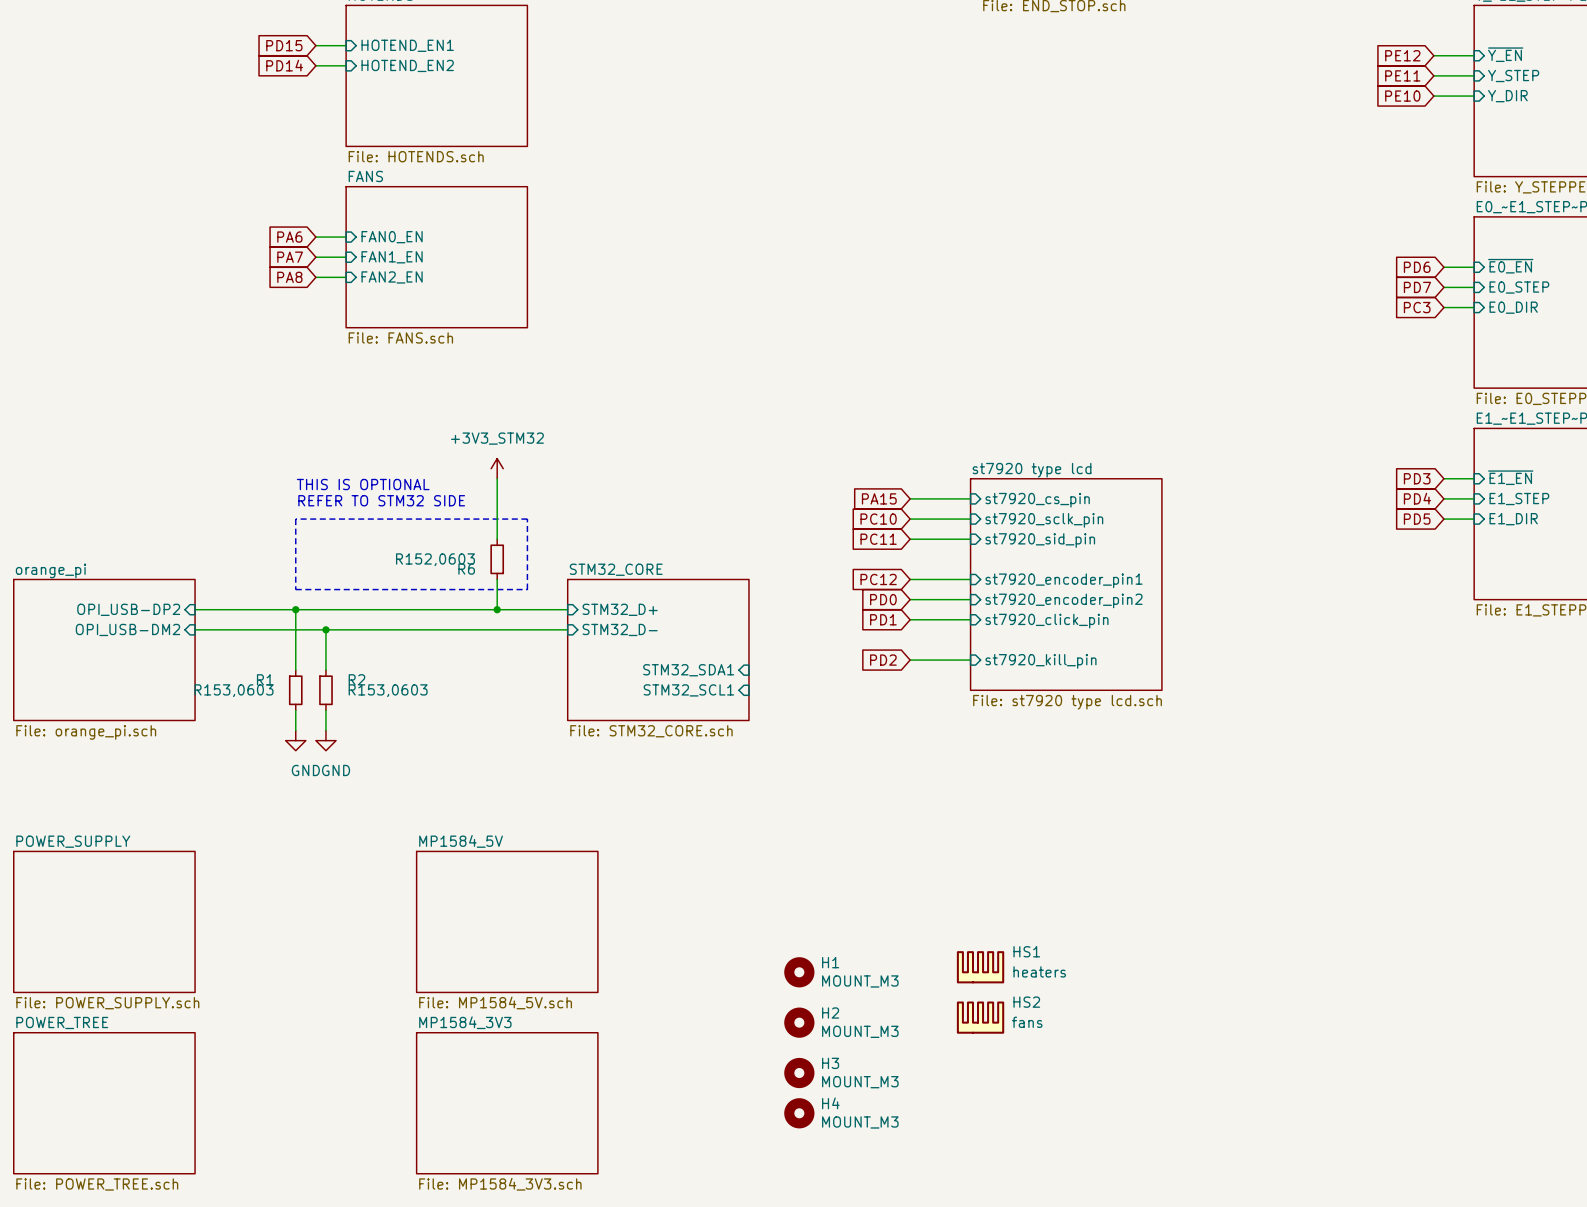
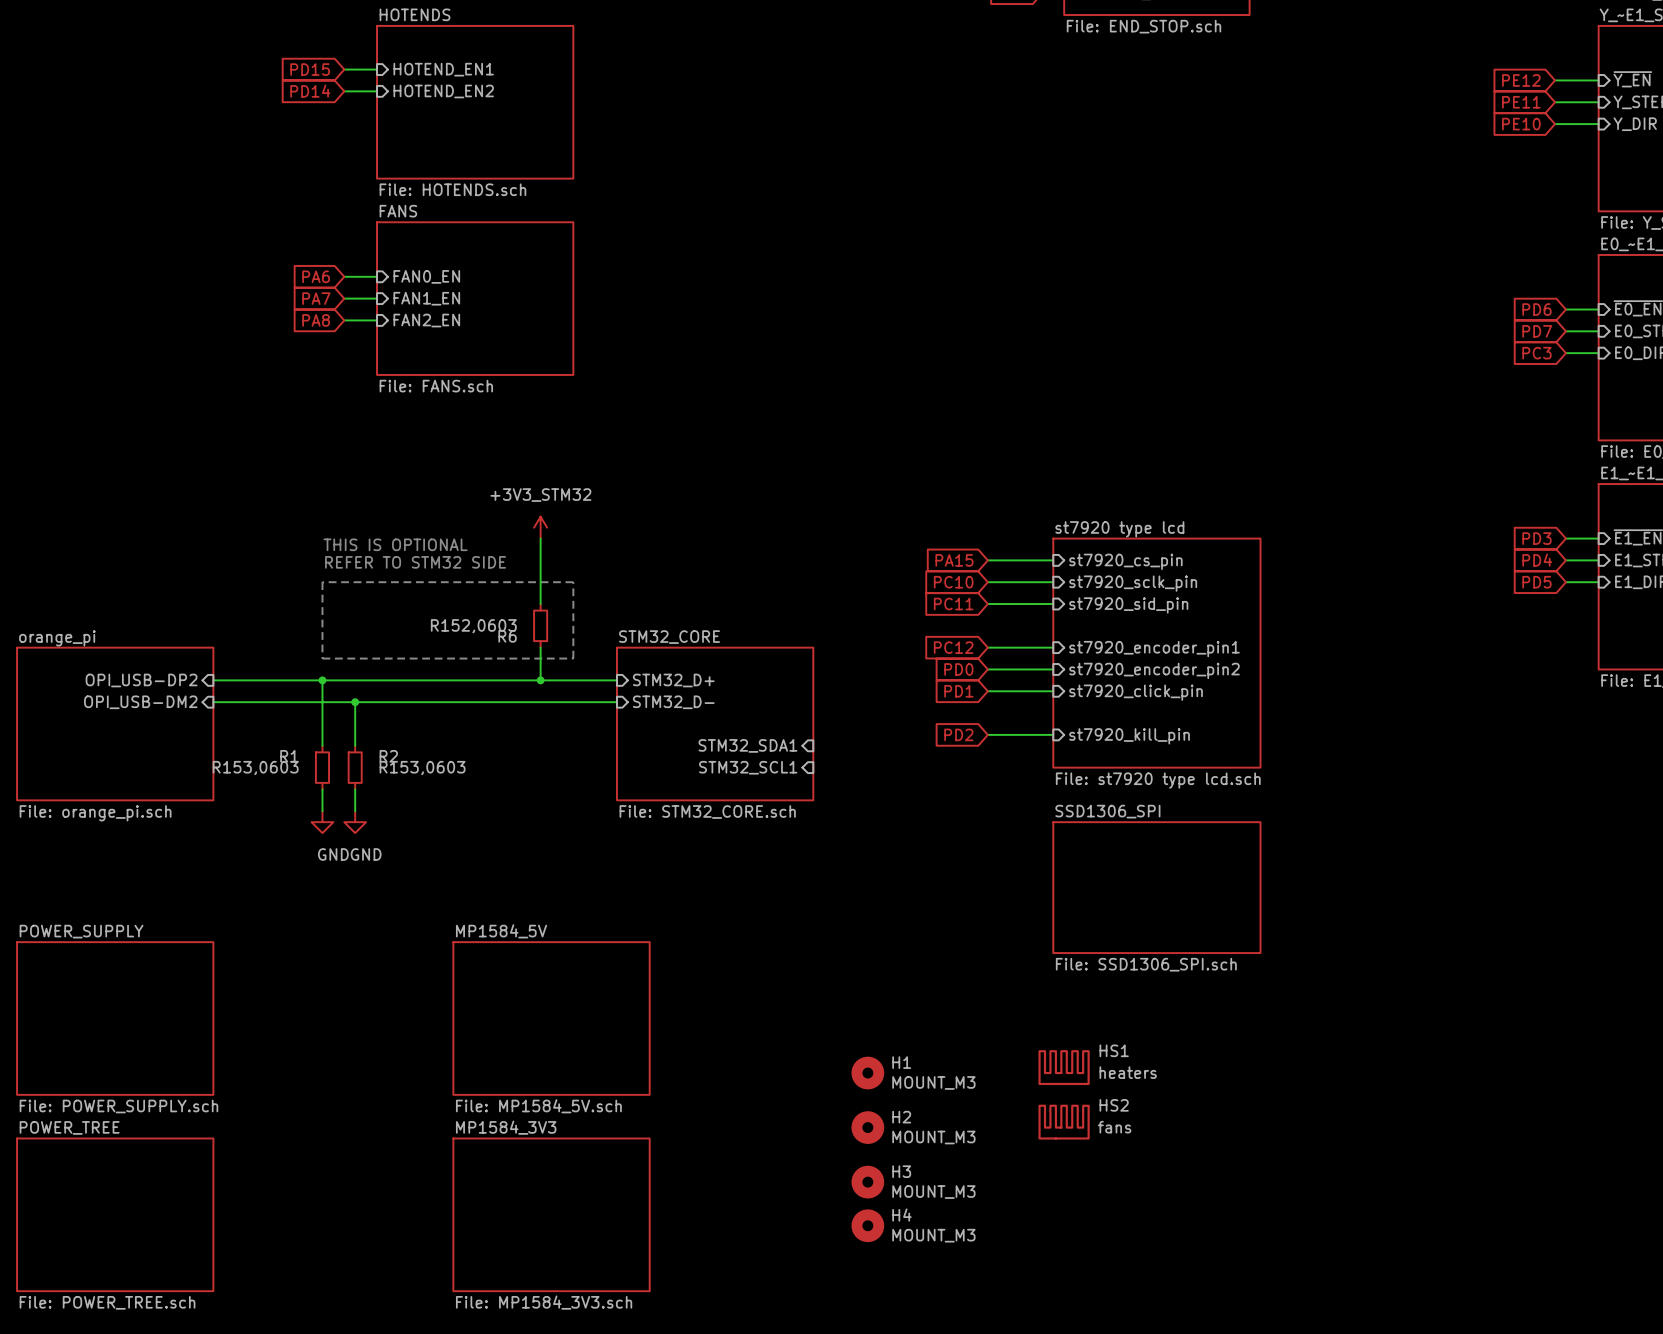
sheet SSD1306_SPI: none -> File: SSD1306_SPI.sch (1156, 887)

